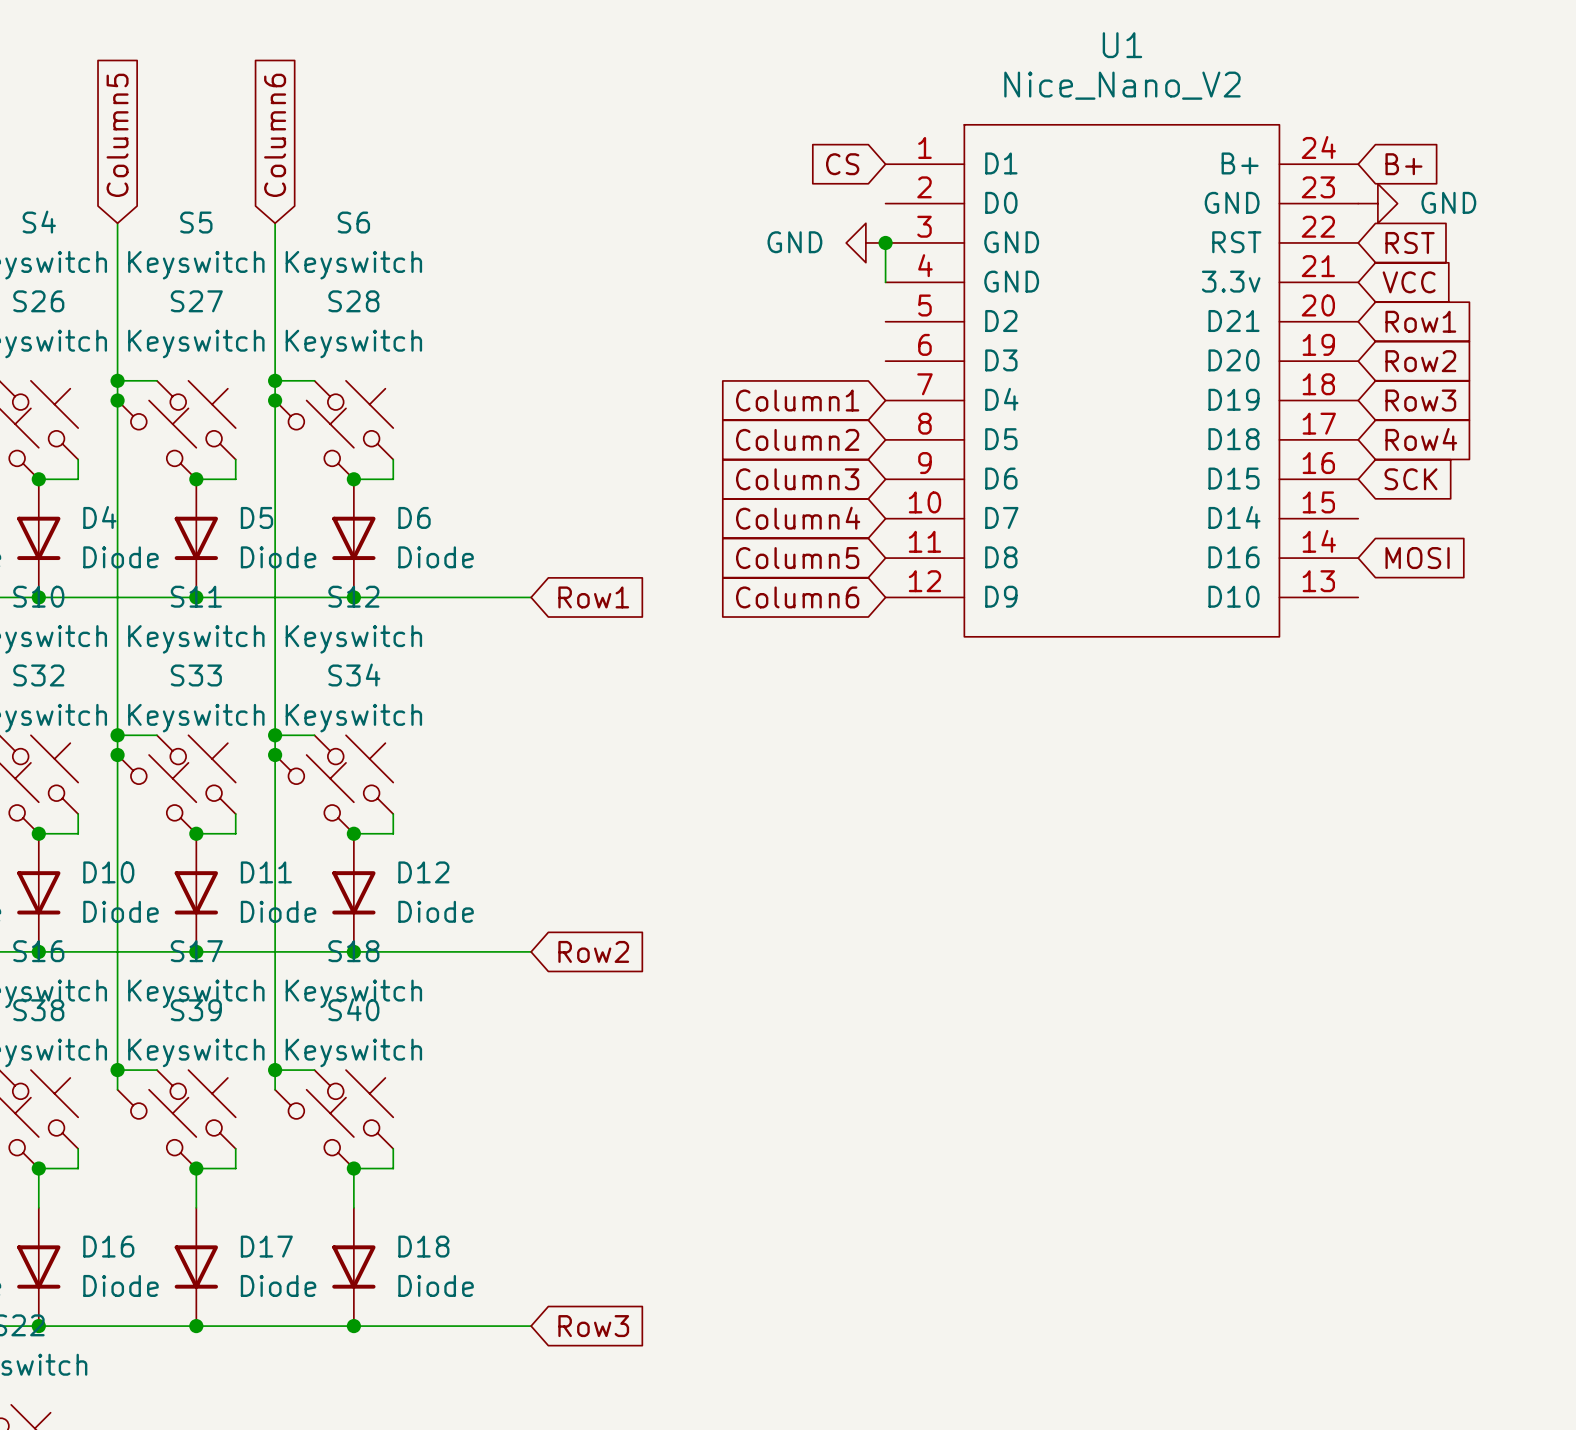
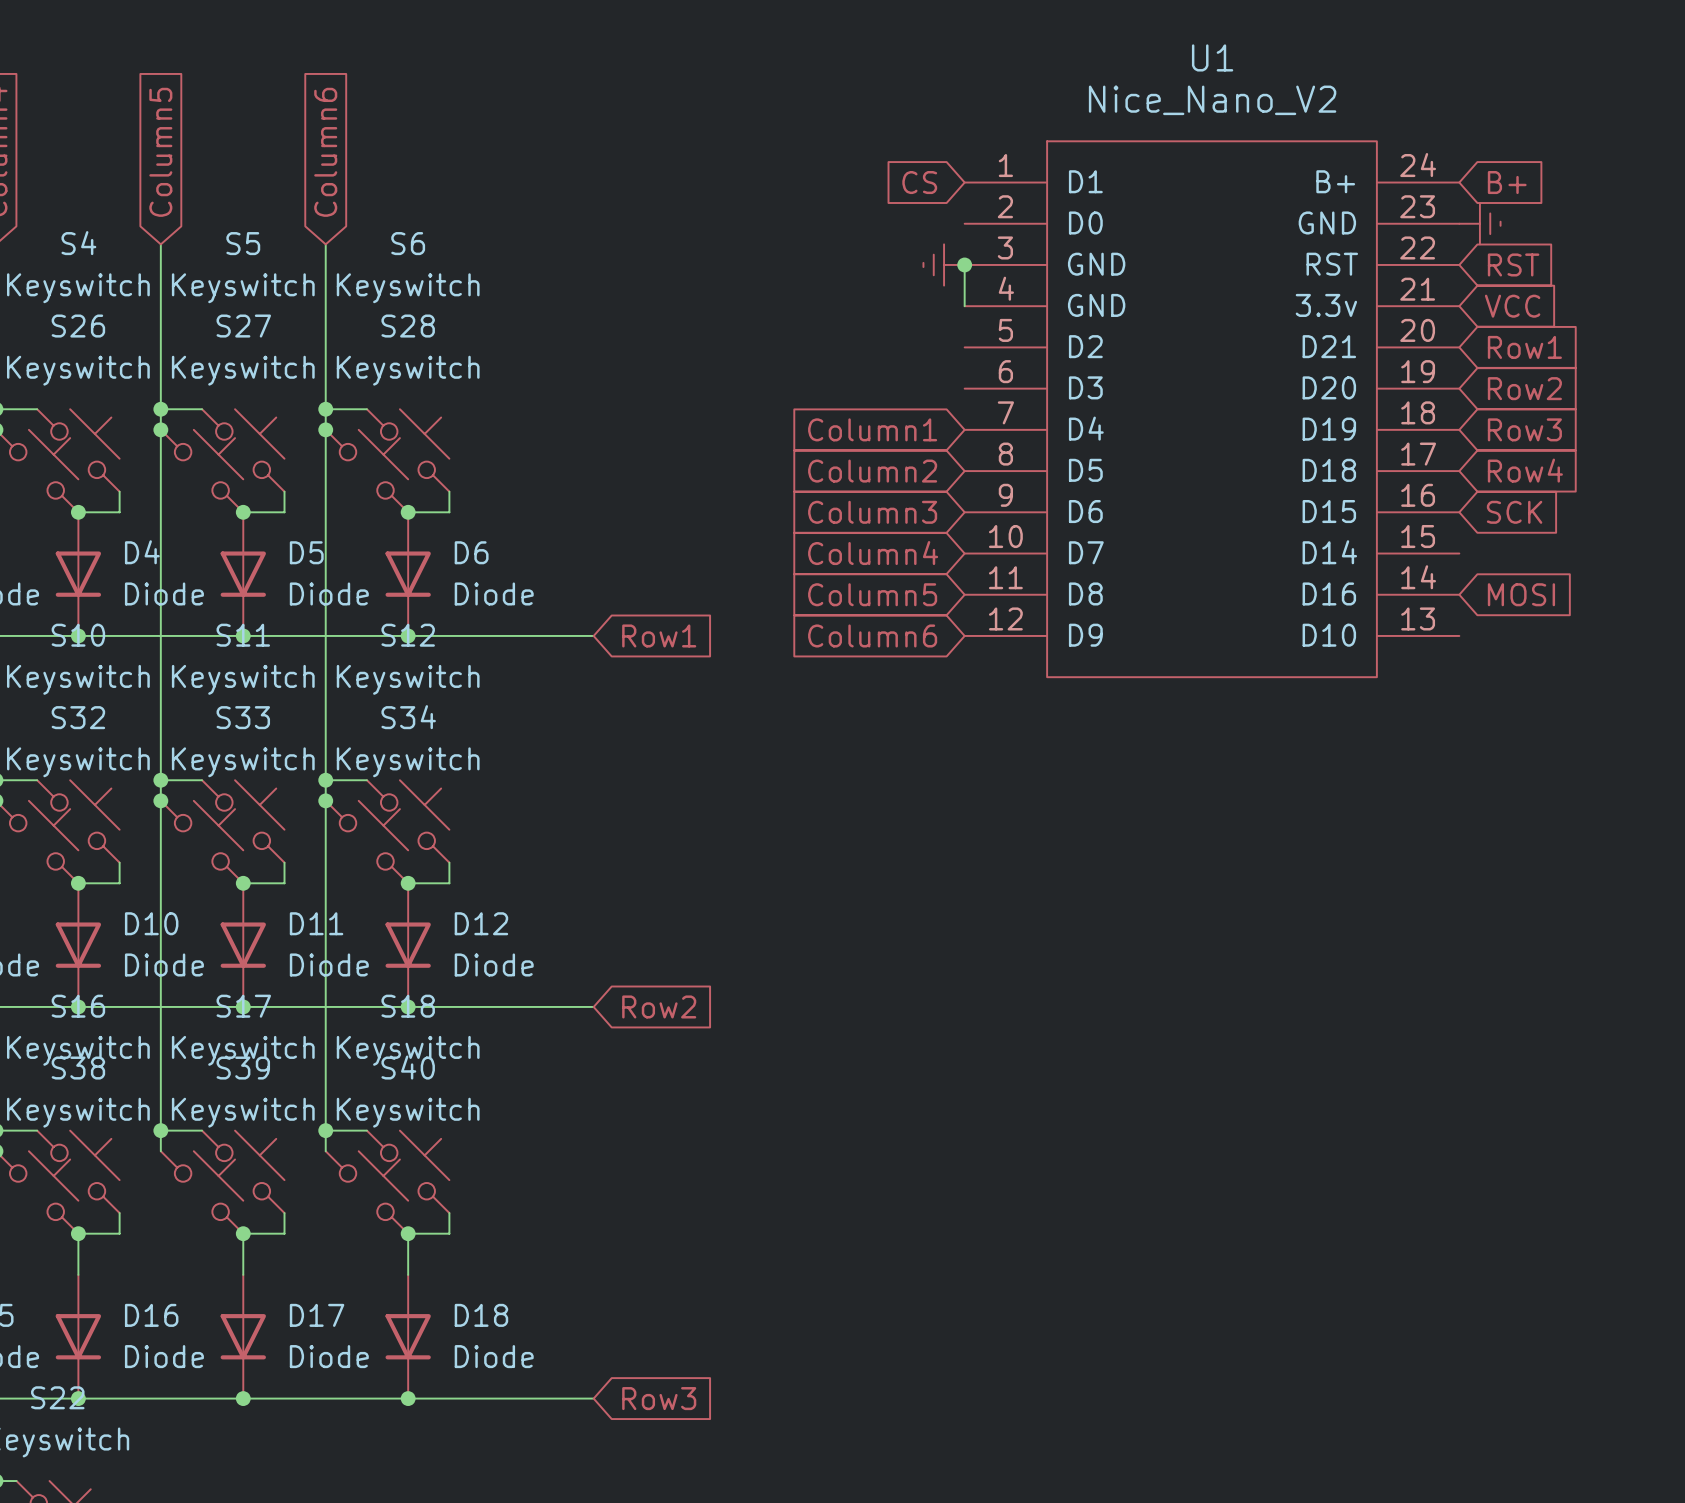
power symbol shape: [1358, 183, 1398, 224] -> [1459, 203, 1501, 245]
power symbol text: GND (1448, 202) -> none
power symbol shape: [846, 223, 886, 263] -> [923, 244, 965, 286]
power symbol text: GND (794, 242) -> none

